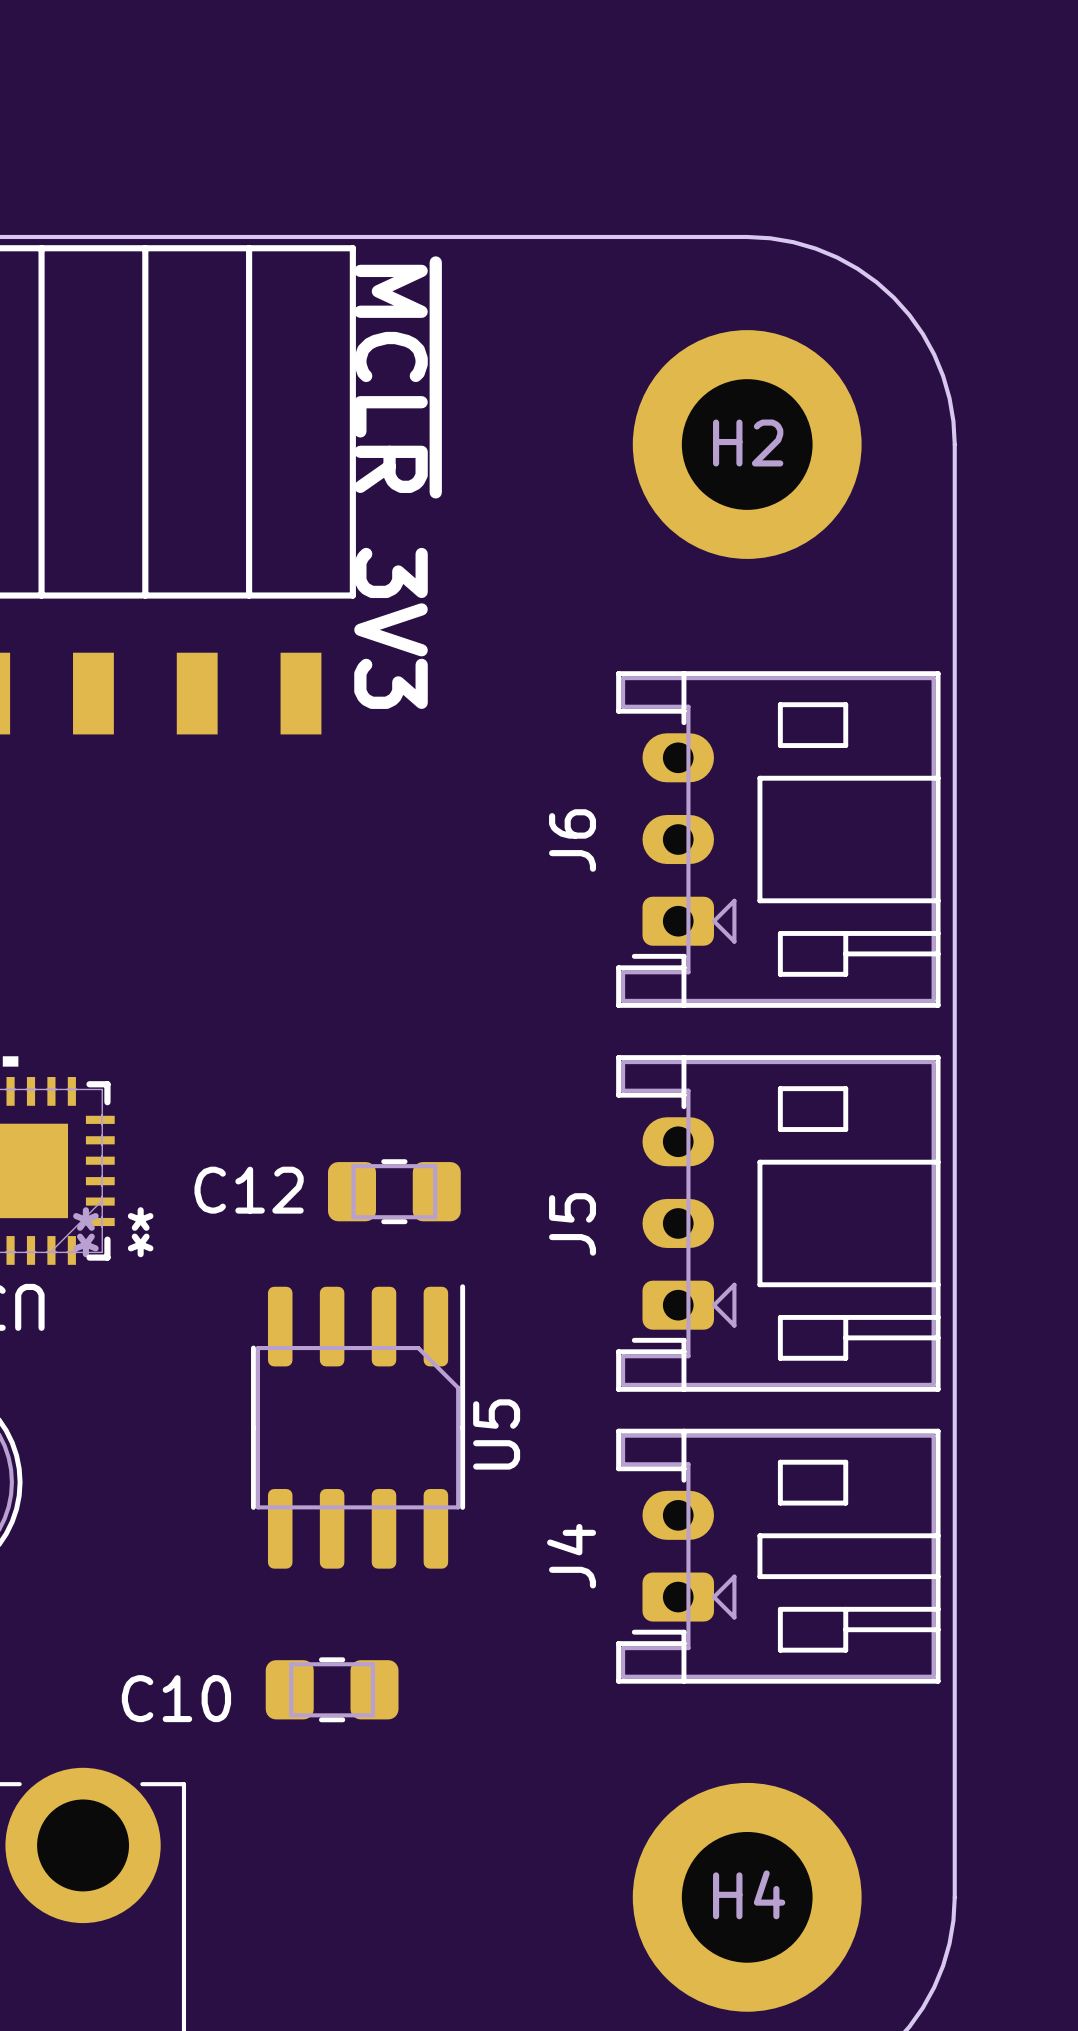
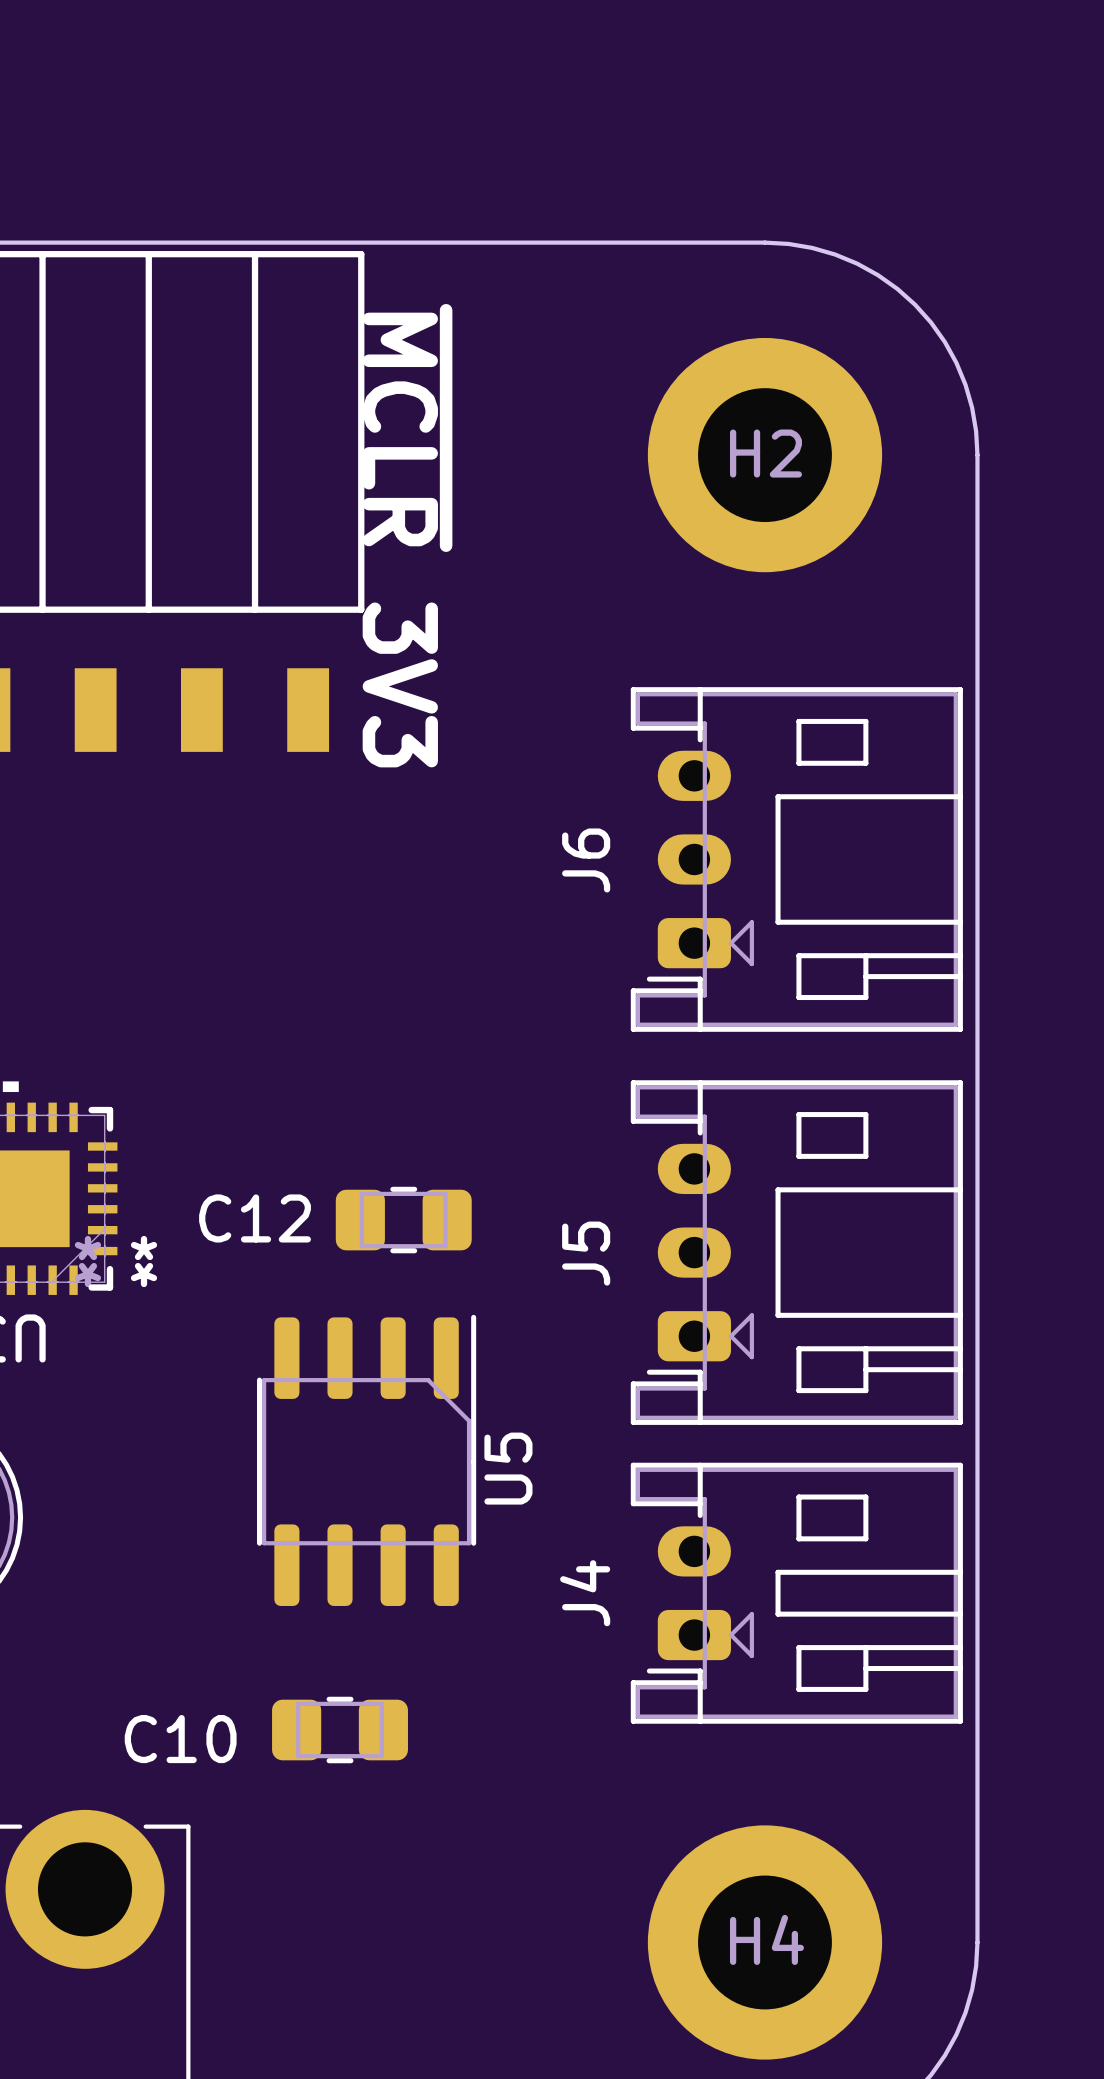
text position: ~{MCLR} 3V3 (398, 482) -> ~{MCLR} 3V3 (407, 535)

